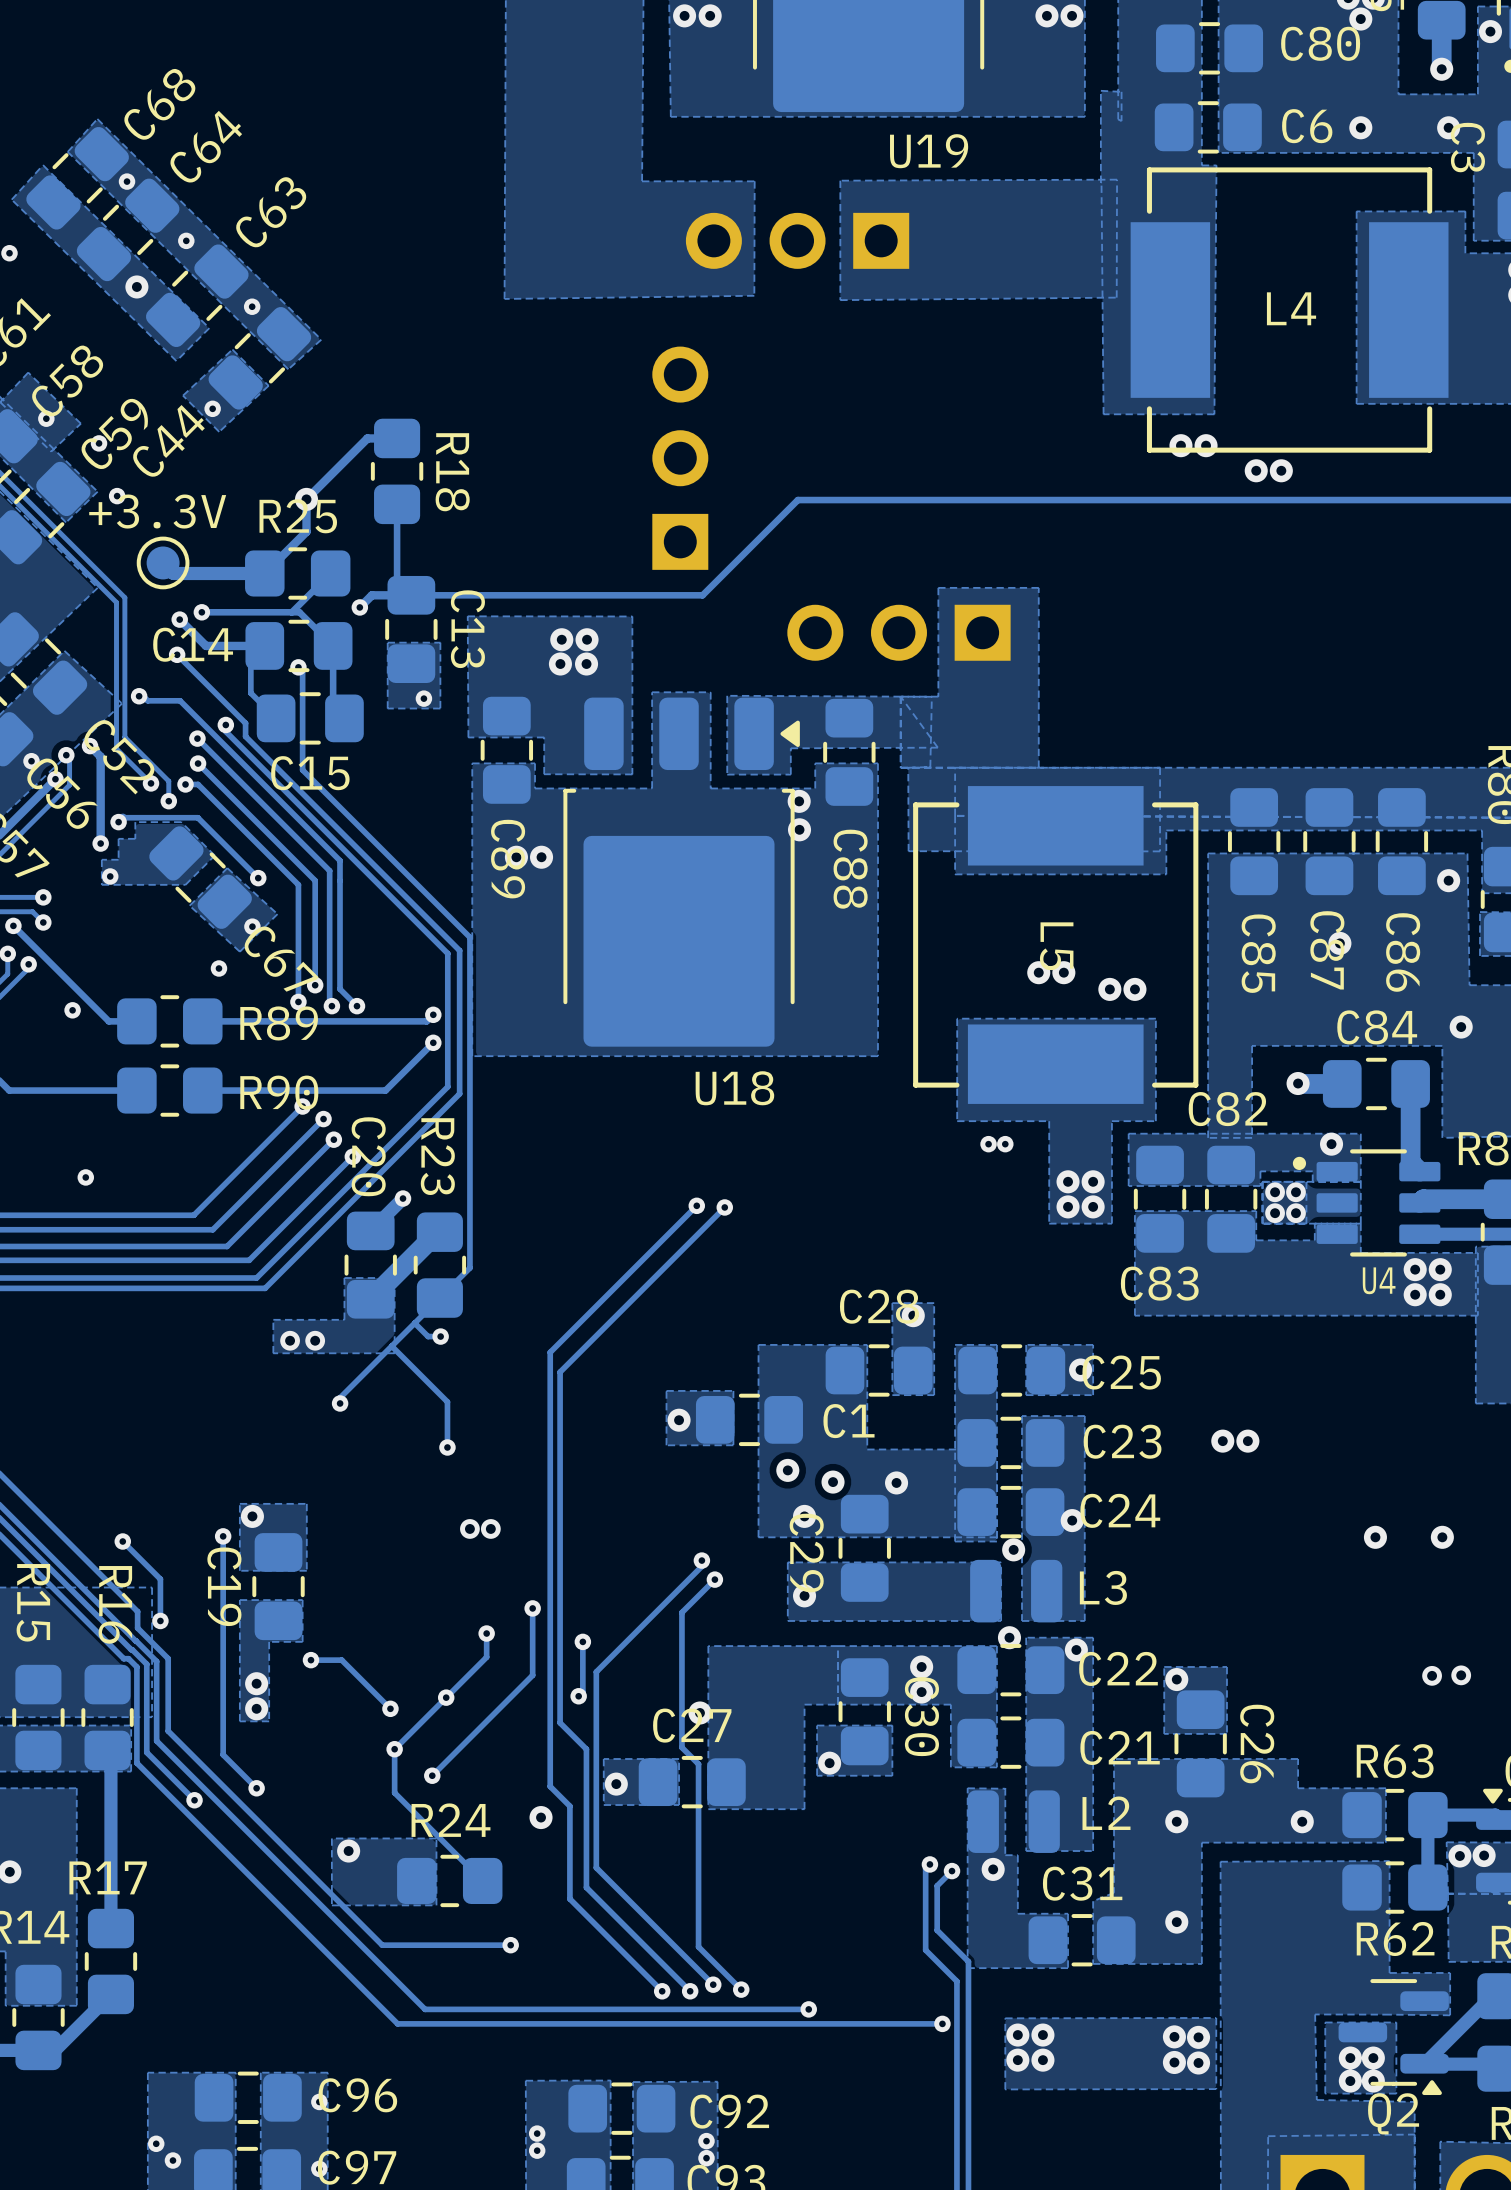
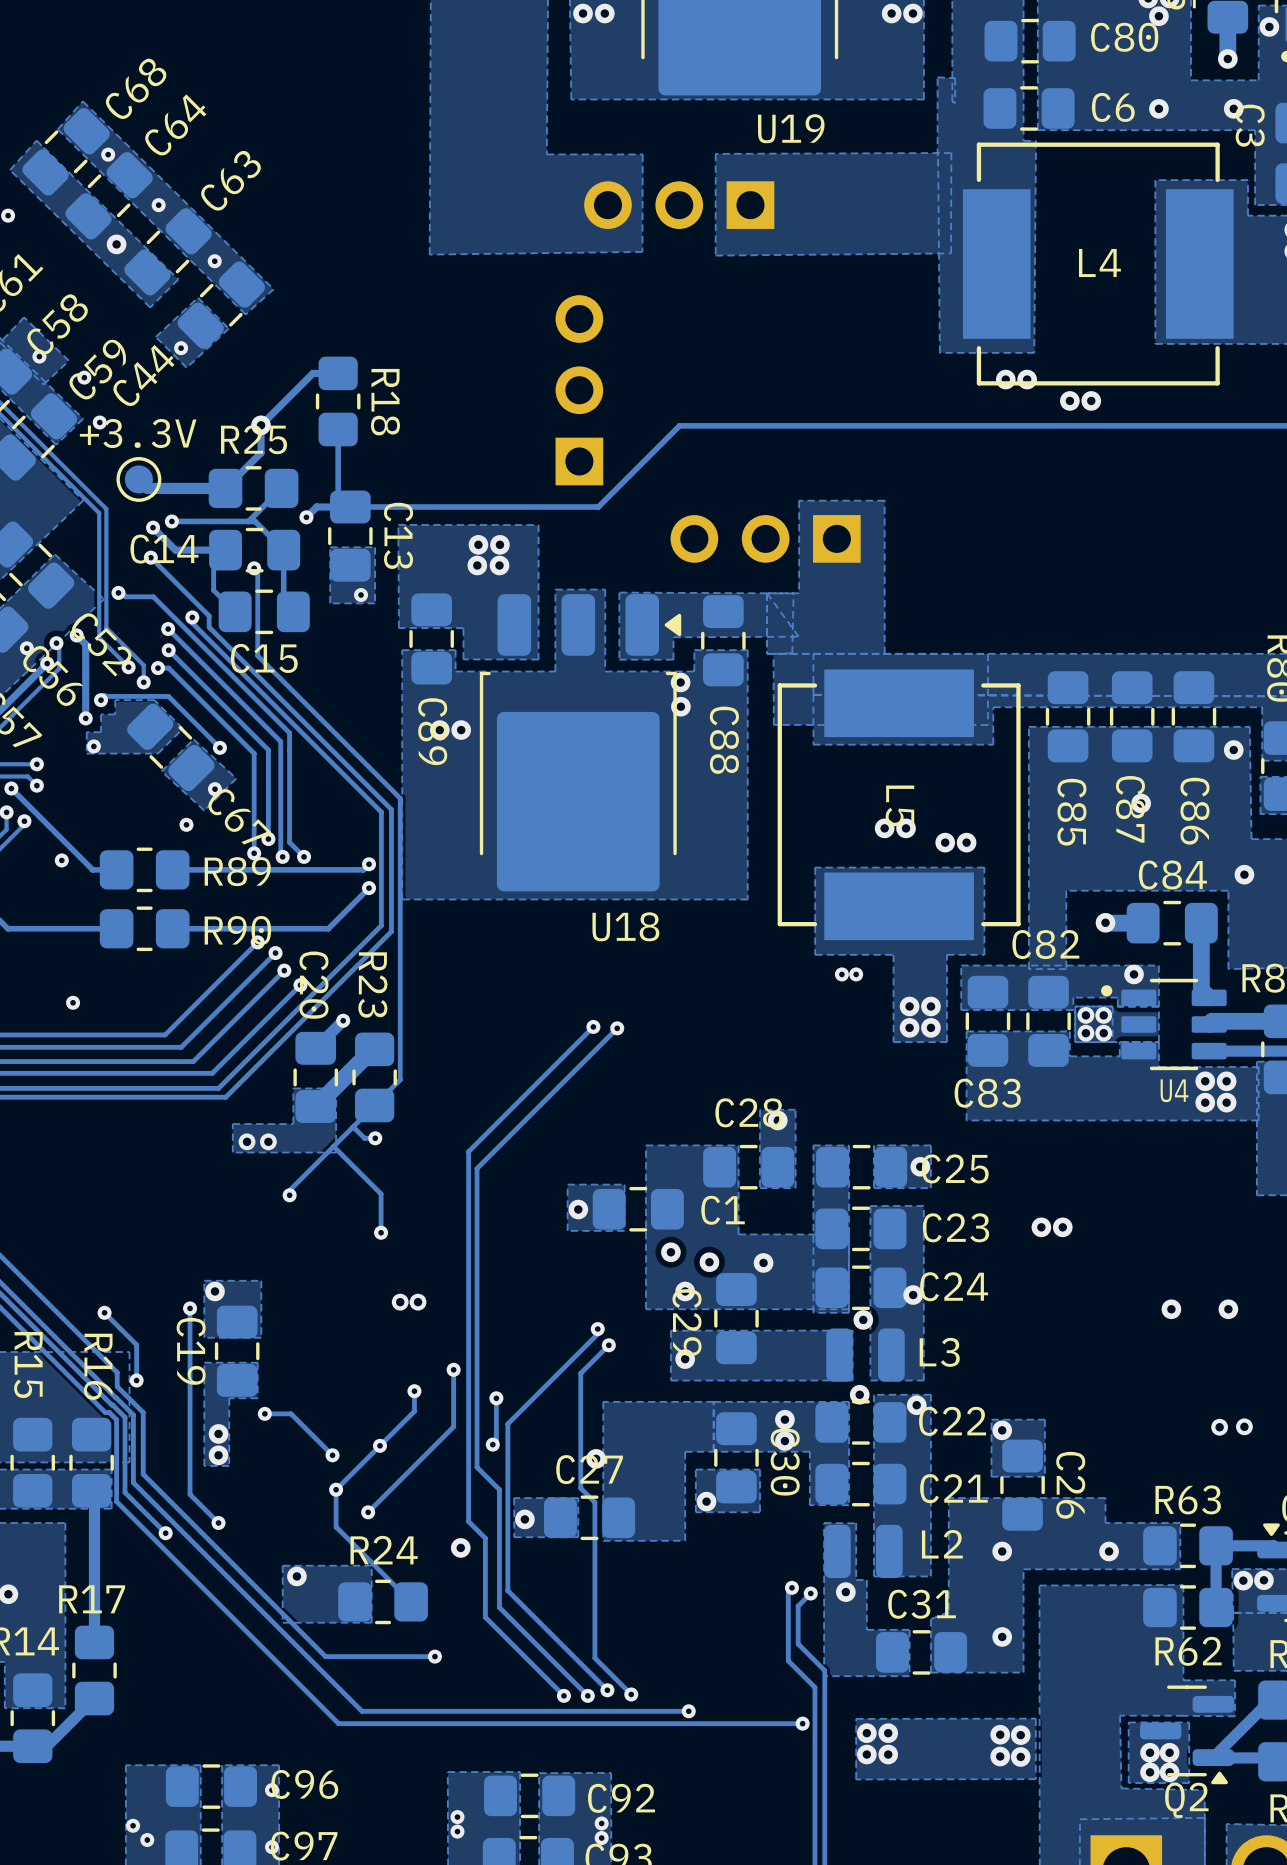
part text: none -> +3.3V (138, 433)
part text: +3.3V (157, 511) -> none

